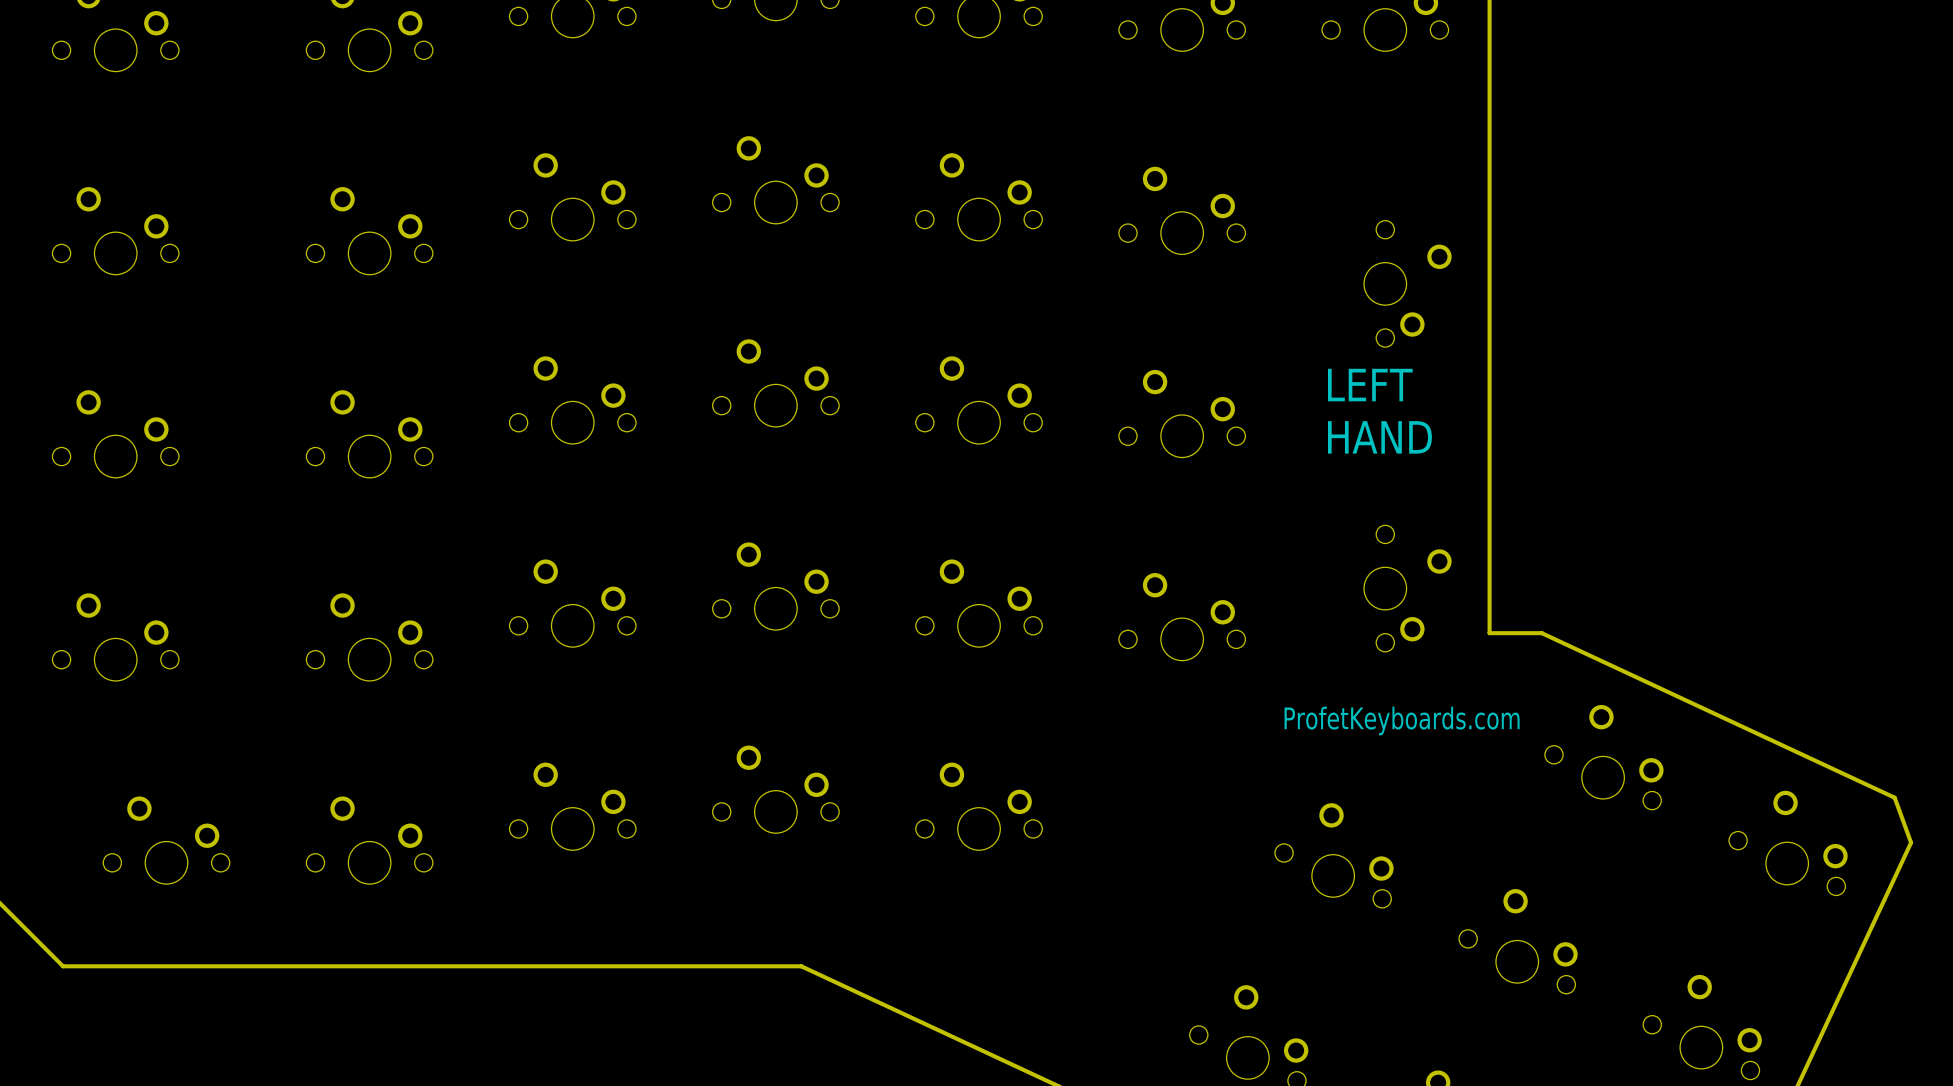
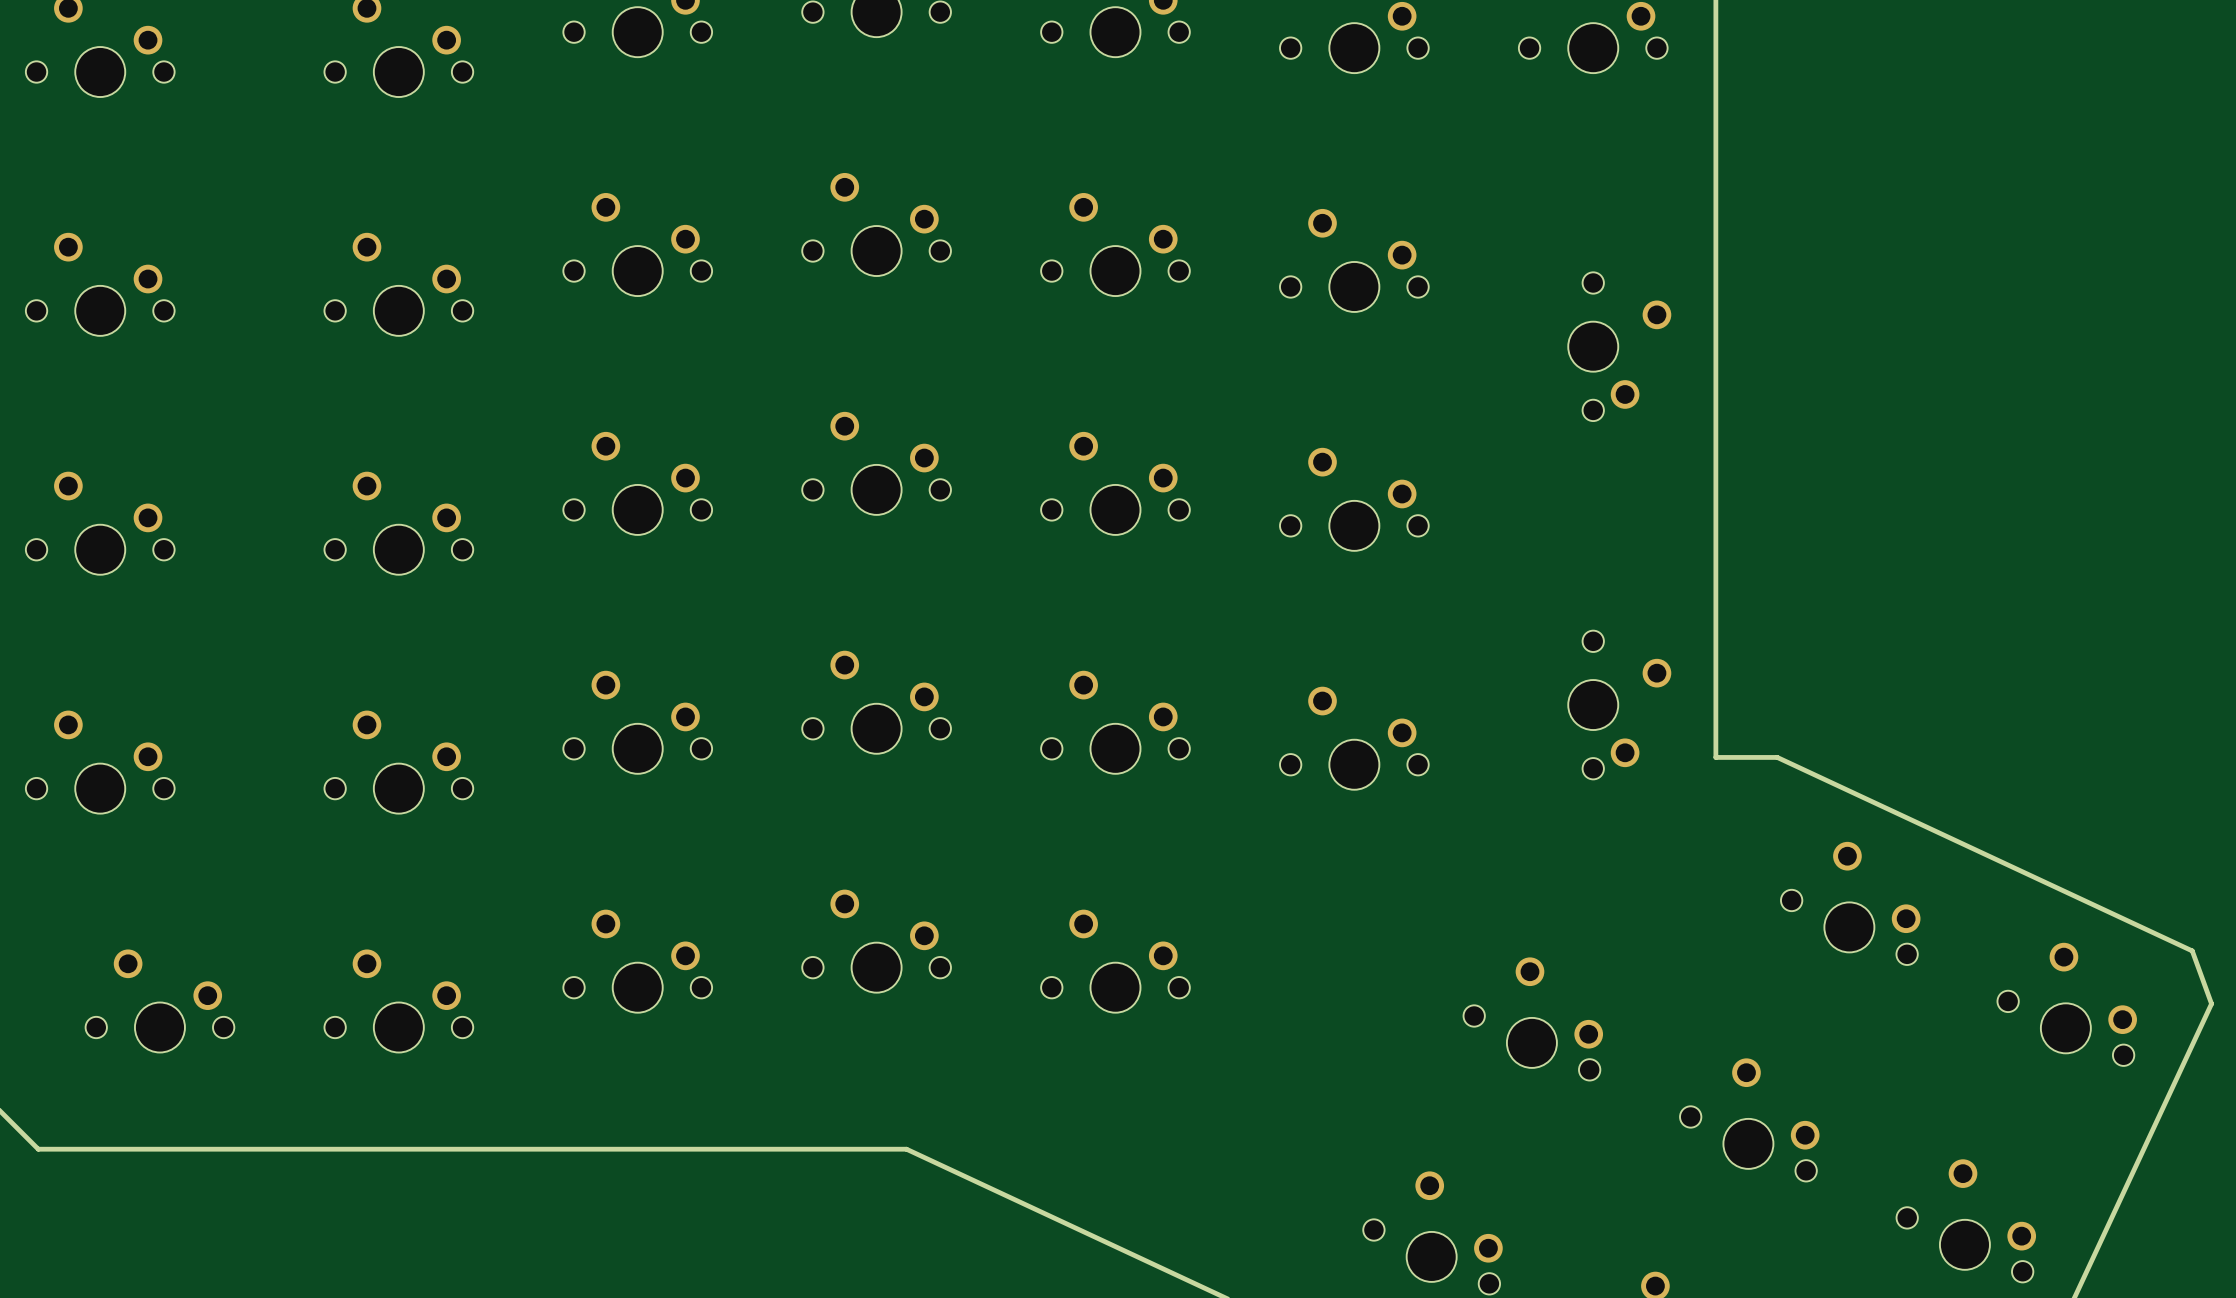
text: LEFT (1370, 385) -> none
text: HAND (1379, 437) -> none
text: ProfetKeyboards.com (1402, 720) -> none

